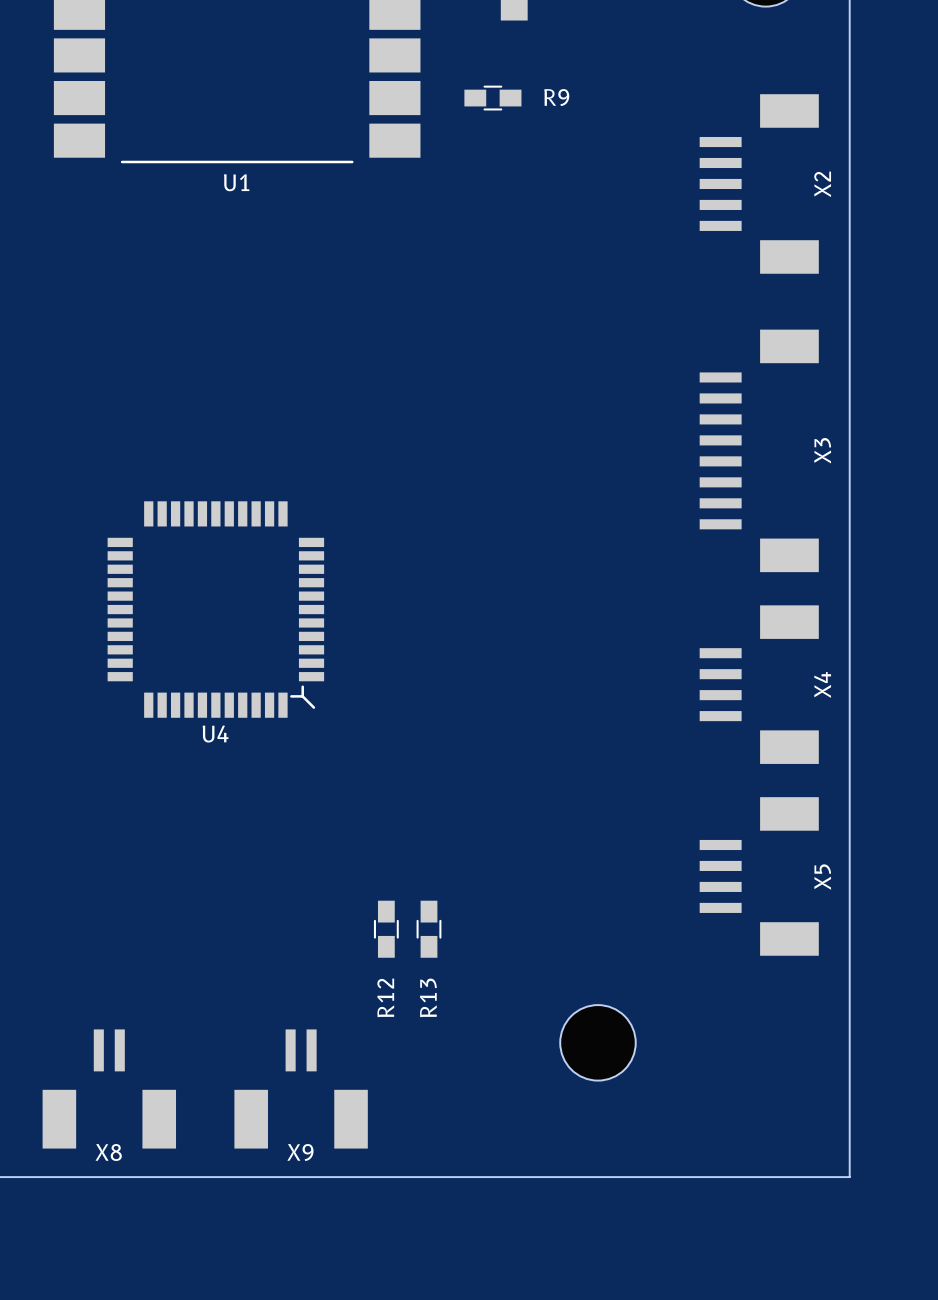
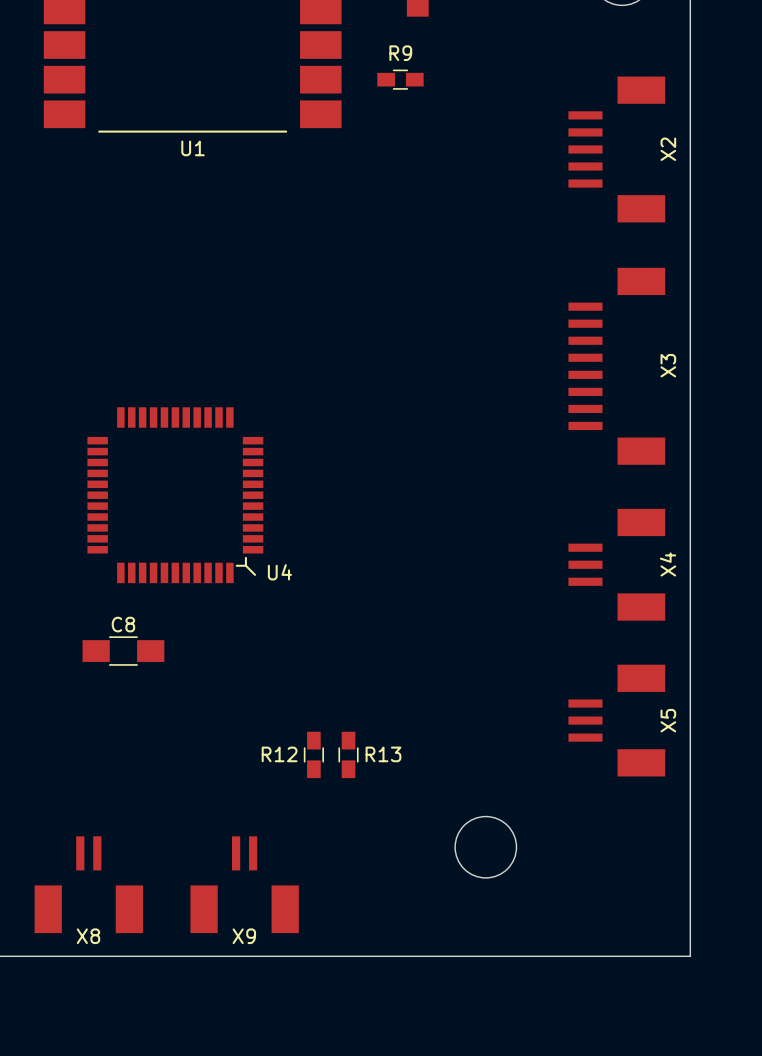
R9 name position: R9 (556, 97) -> R9 (400, 53)
X4 footprint: [699, 605, 819, 764] -> [568, 508, 666, 621]
U4 name position: U4 (215, 734) -> U4 (279, 572)
X5 footprint: [699, 797, 819, 956] -> [568, 664, 666, 777]
C8: none -> (123, 651)
R12 name rotation: 0° (385, 997) -> 90° clockwise (279, 754)
R12 name position: R12 (385, 997) -> R12 (279, 754)
R13 name rotation: 0° (428, 997) -> 90° clockwise (383, 754)
R13 name position: R13 (428, 997) -> R13 (383, 754)

